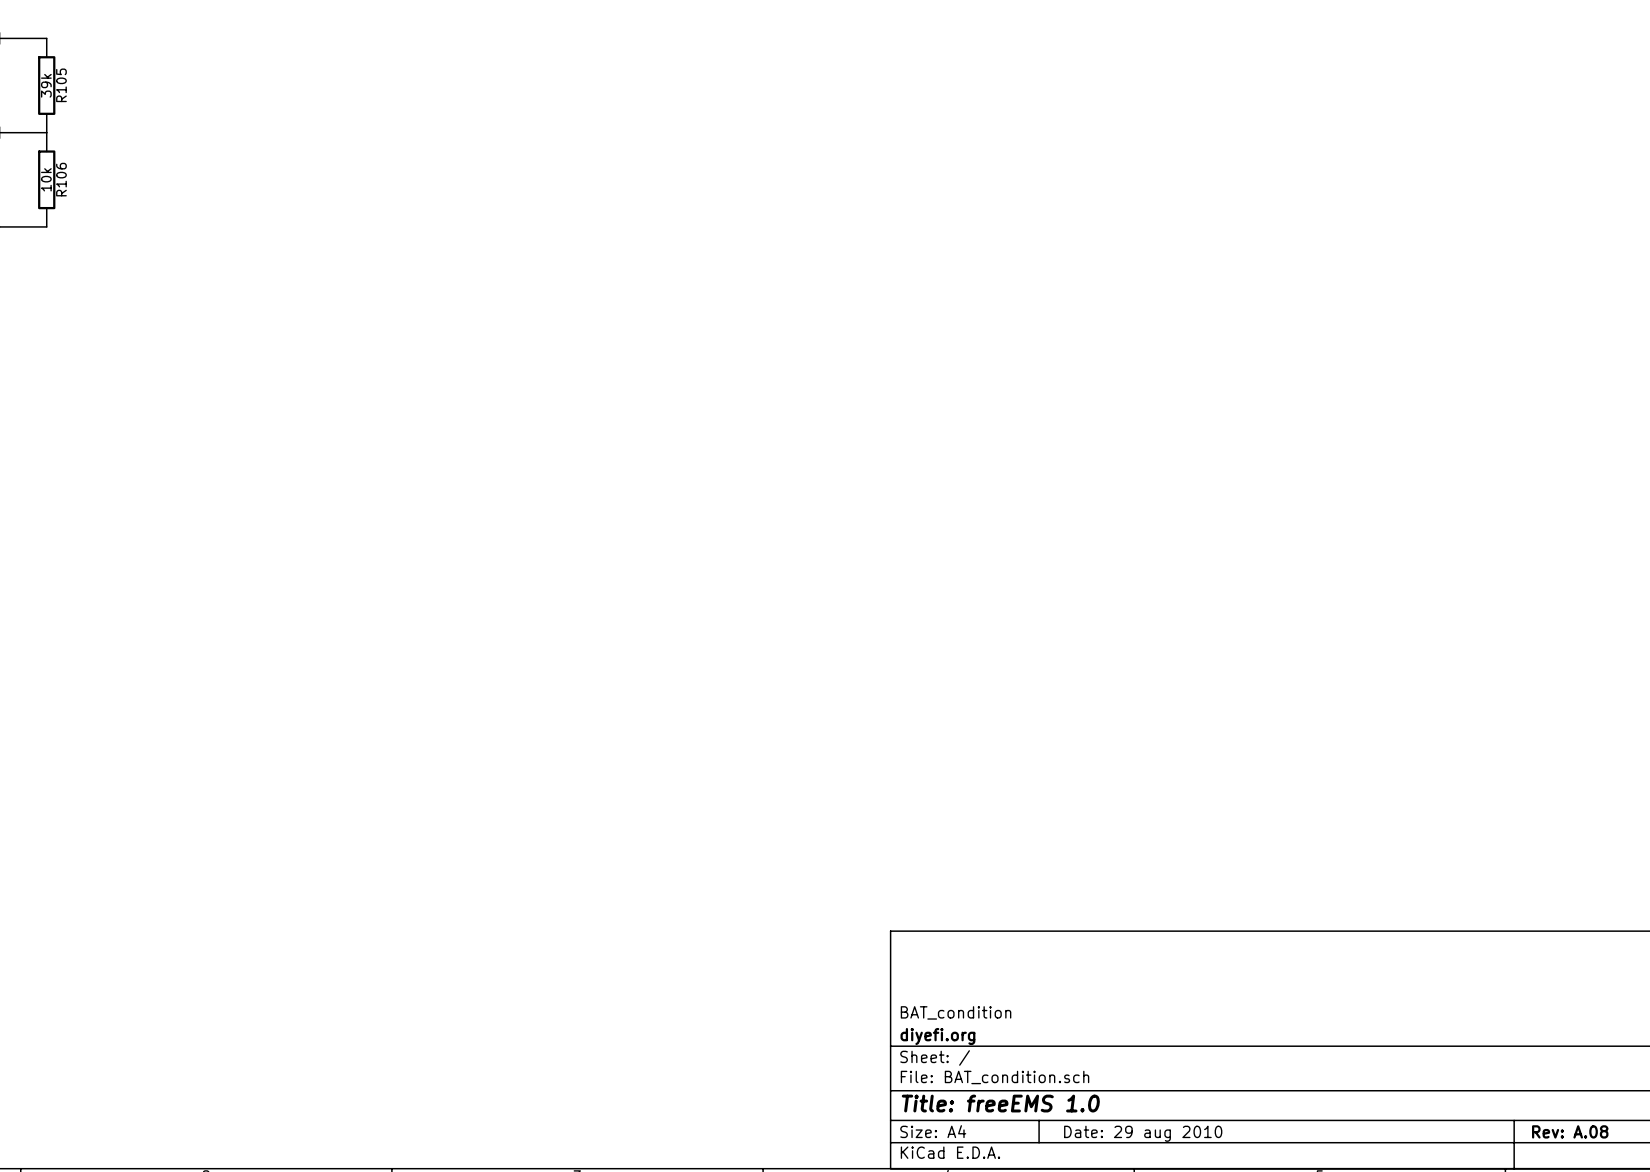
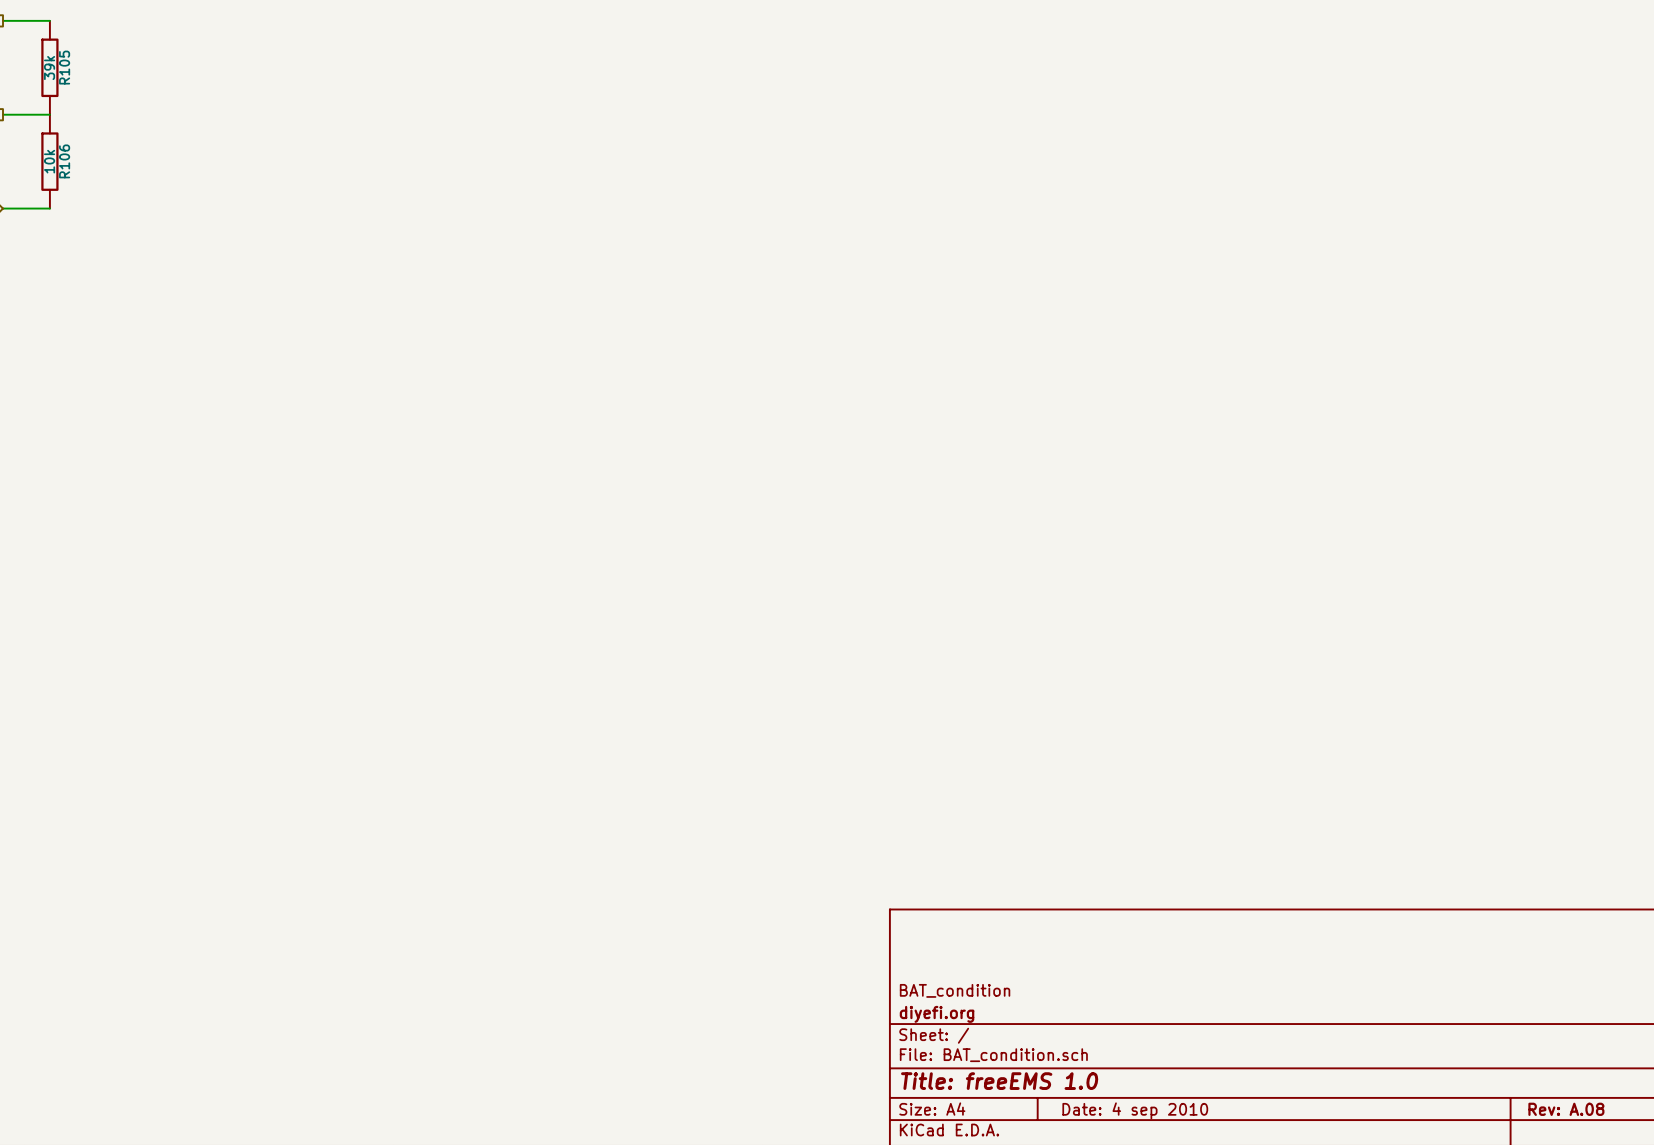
title block: Date: 29 aug 2010 (1143, 1133) -> Date: 4 sep 2010 (1135, 1110)

